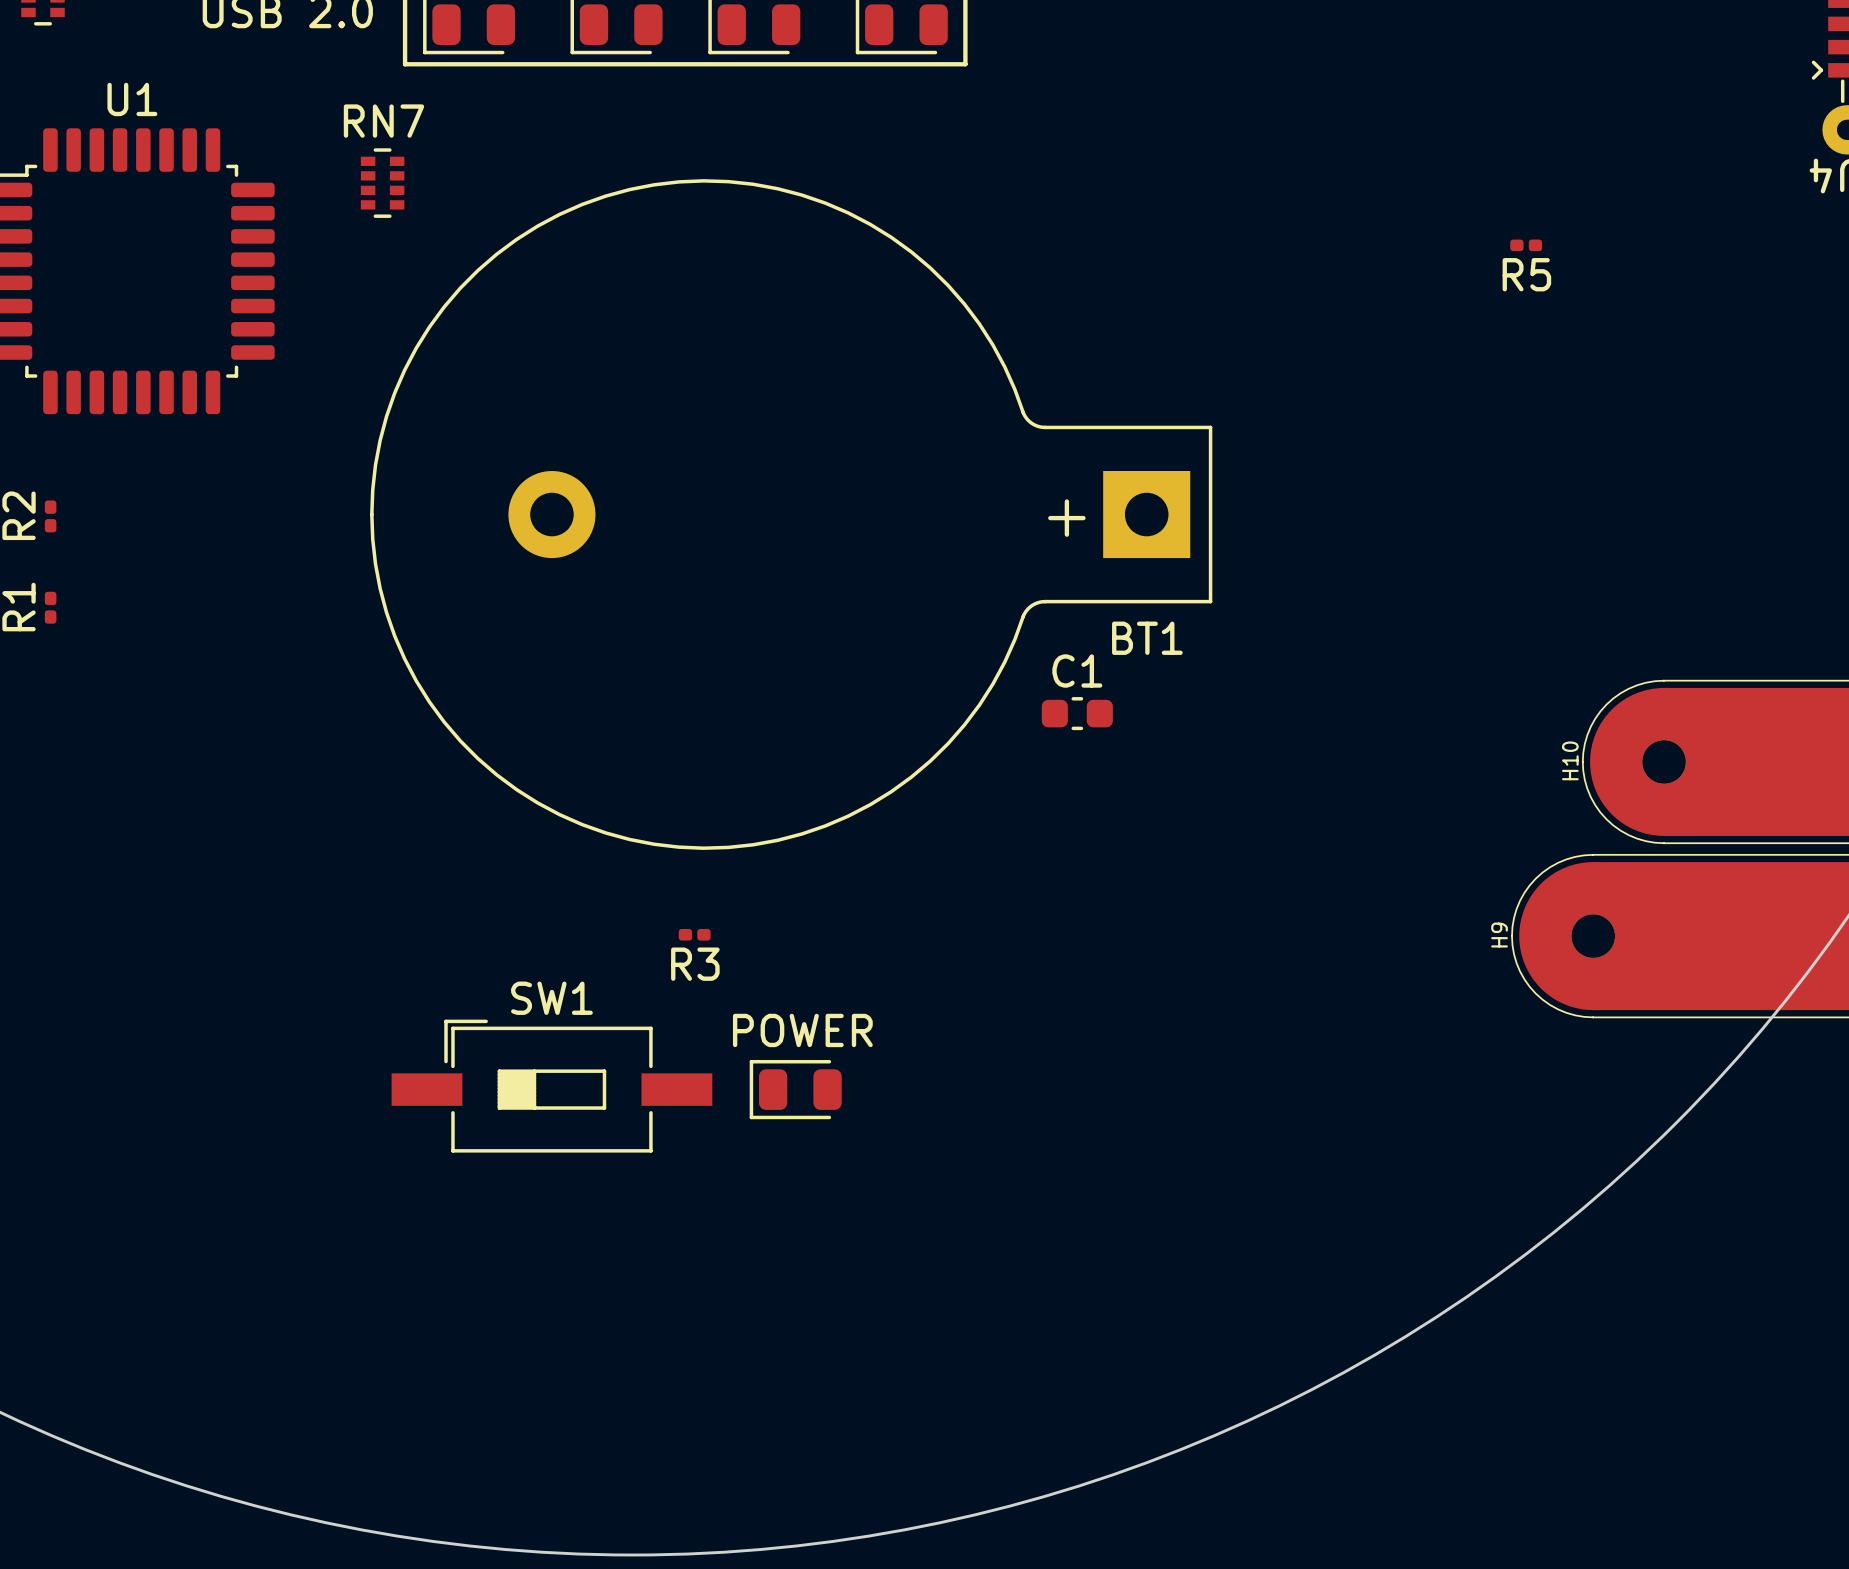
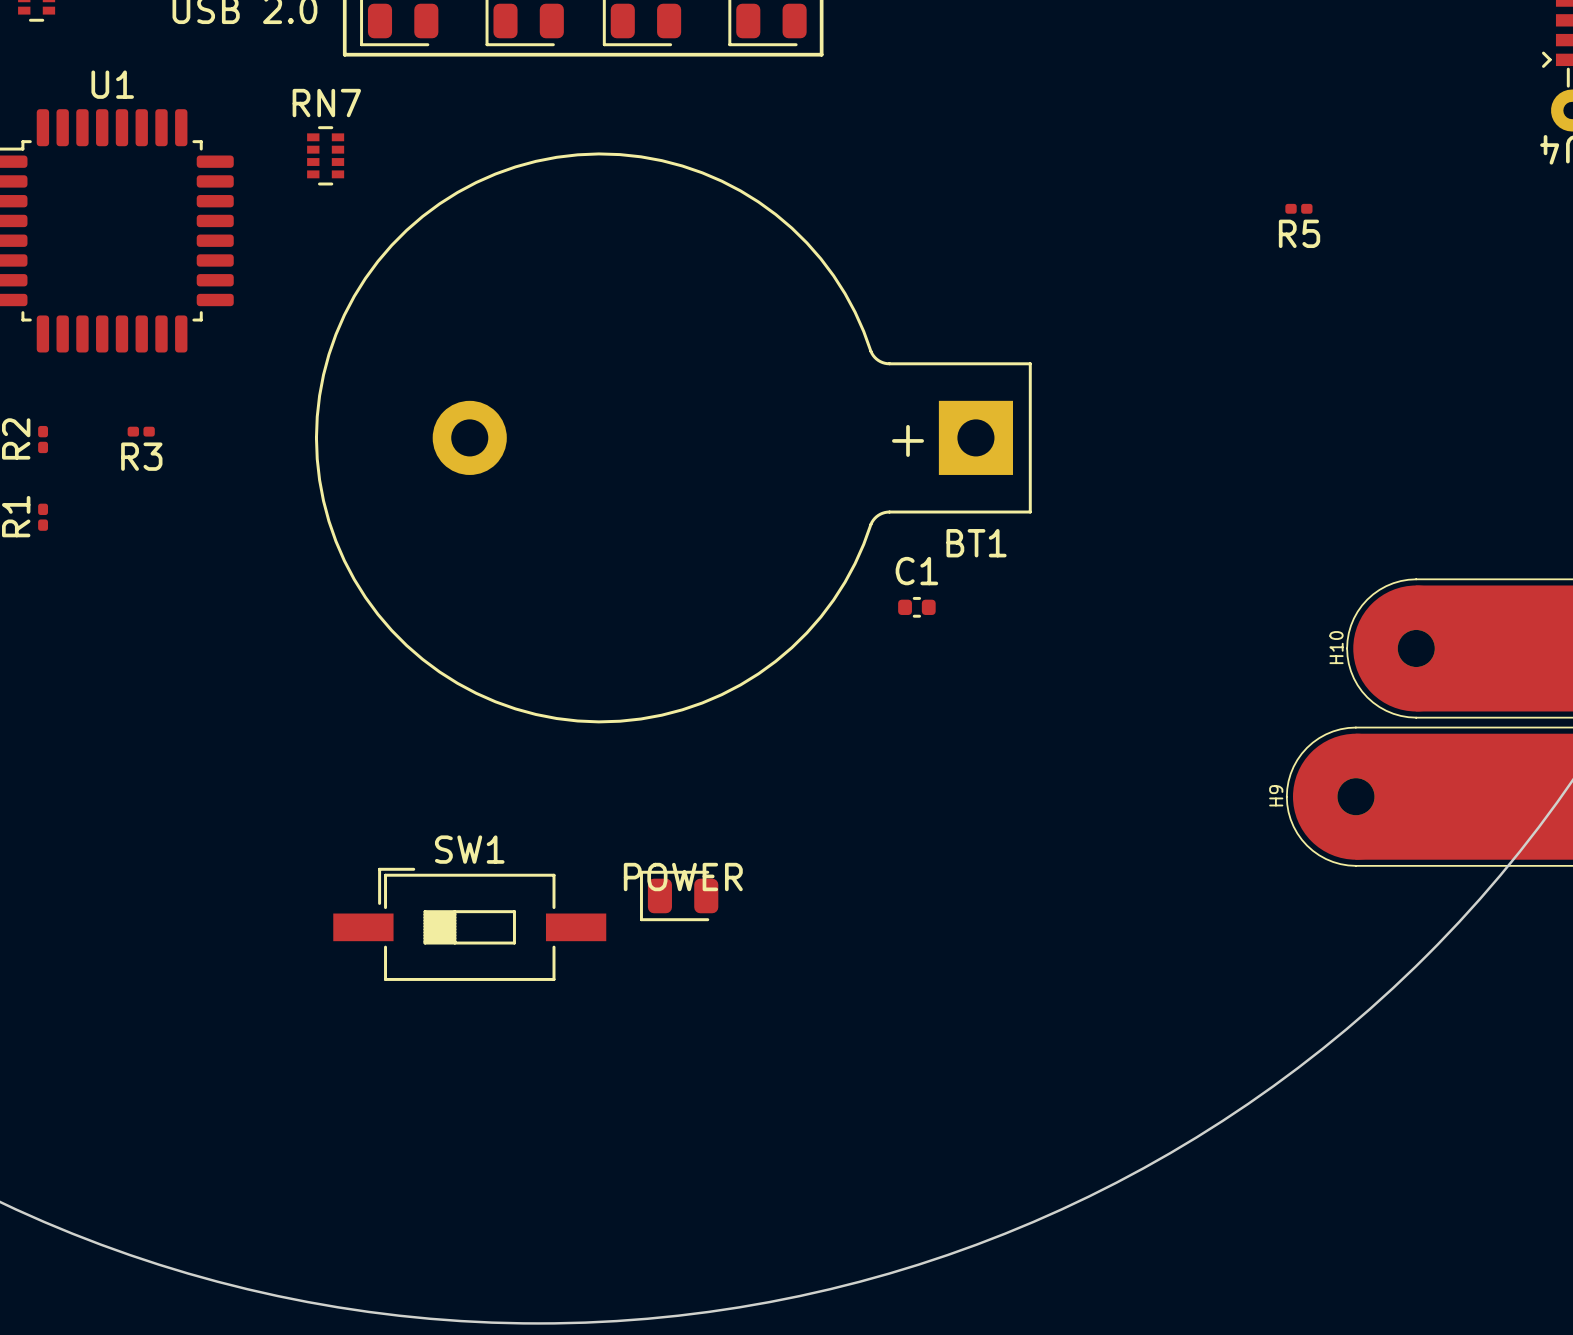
C1 footprint: [1041, 697, 1113, 731] -> [898, 596, 936, 618]
R3 position: (694, 934) -> (141, 431)
part position: (795, 1089) -> (679, 895)

